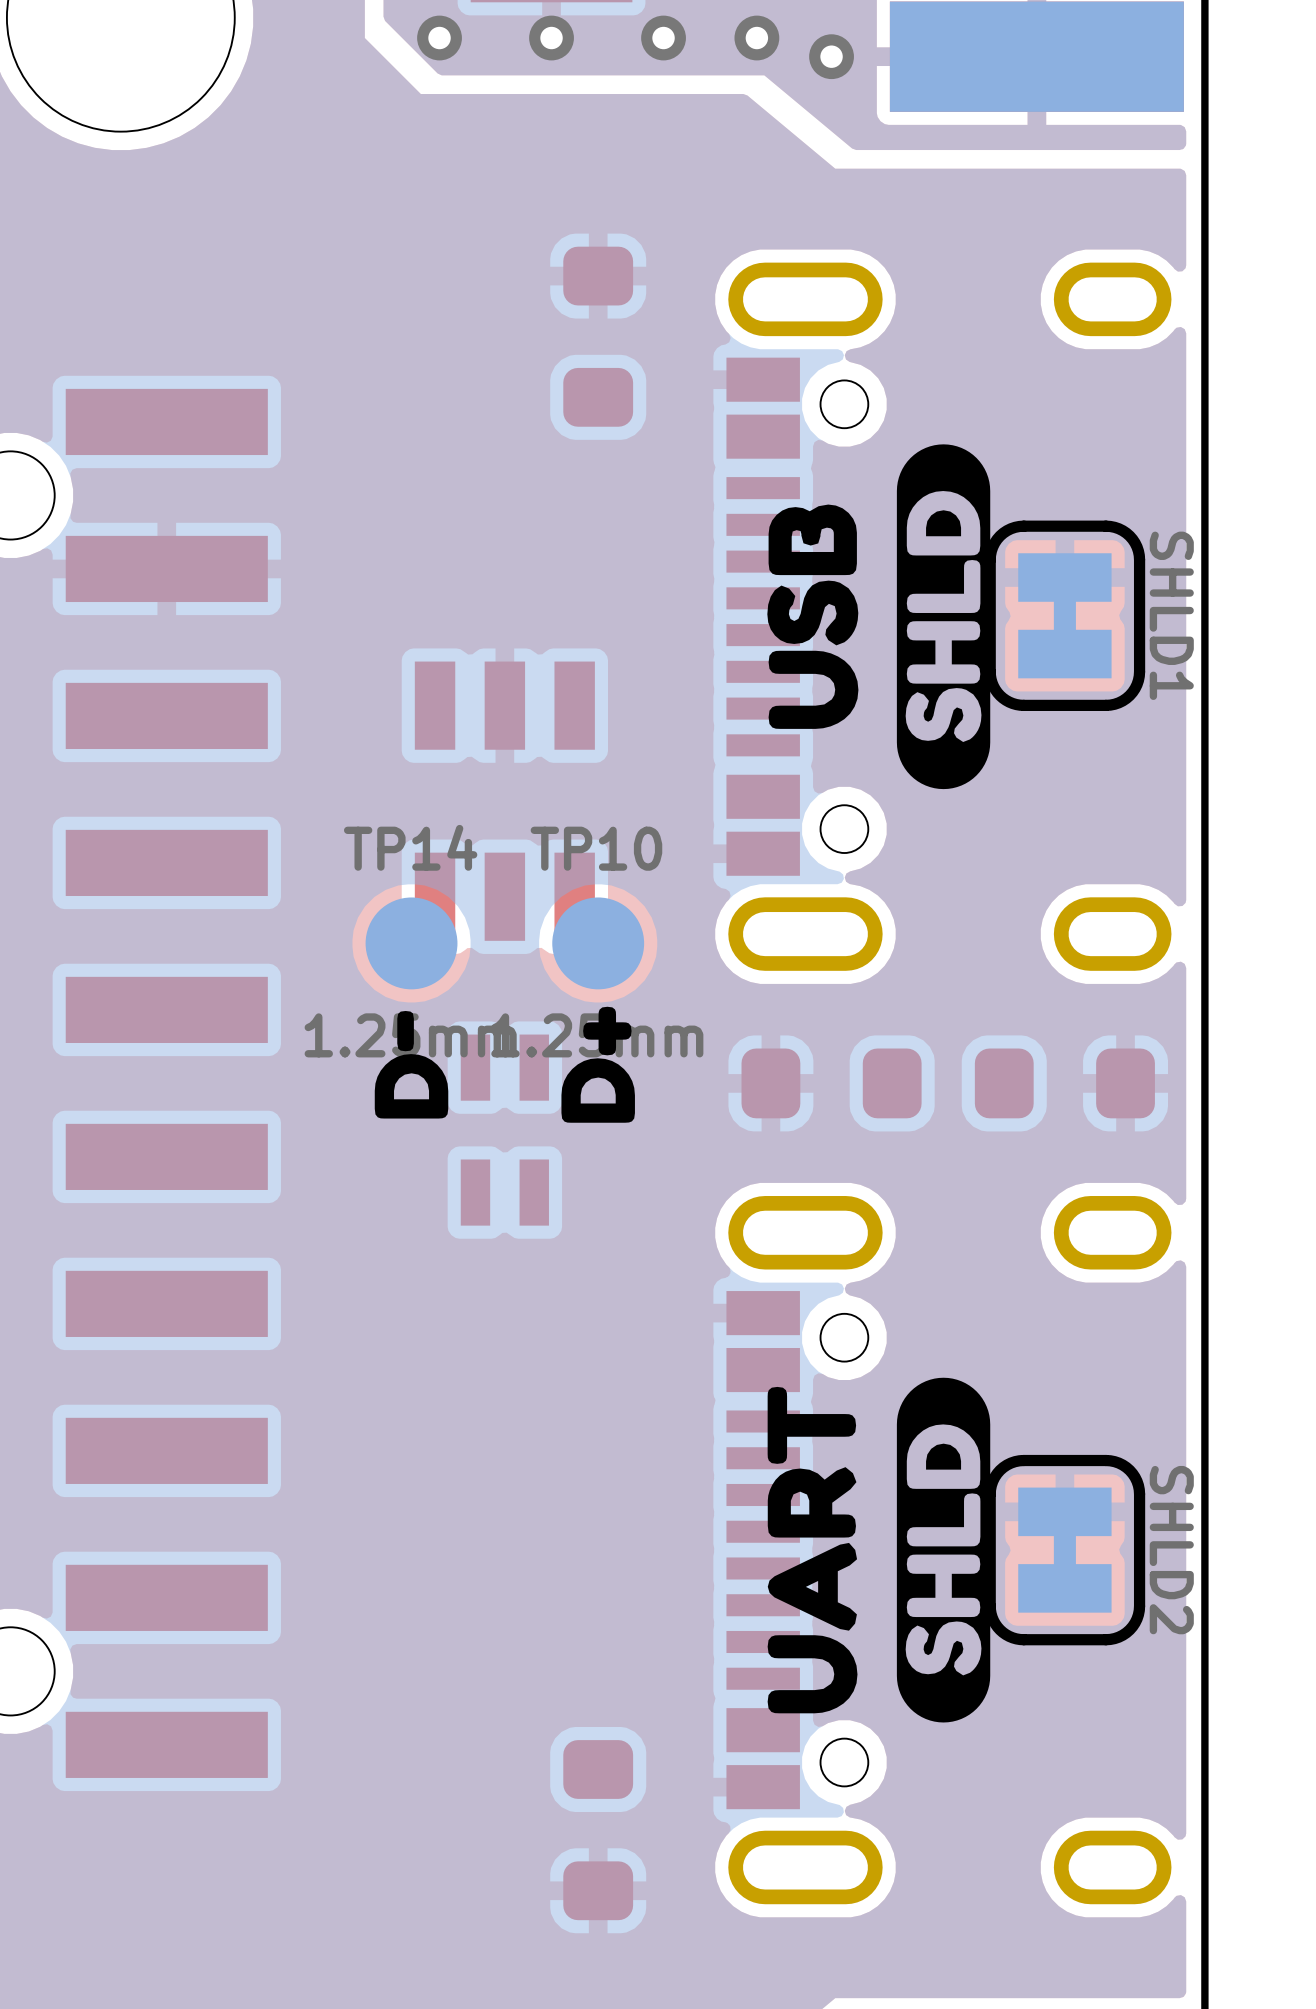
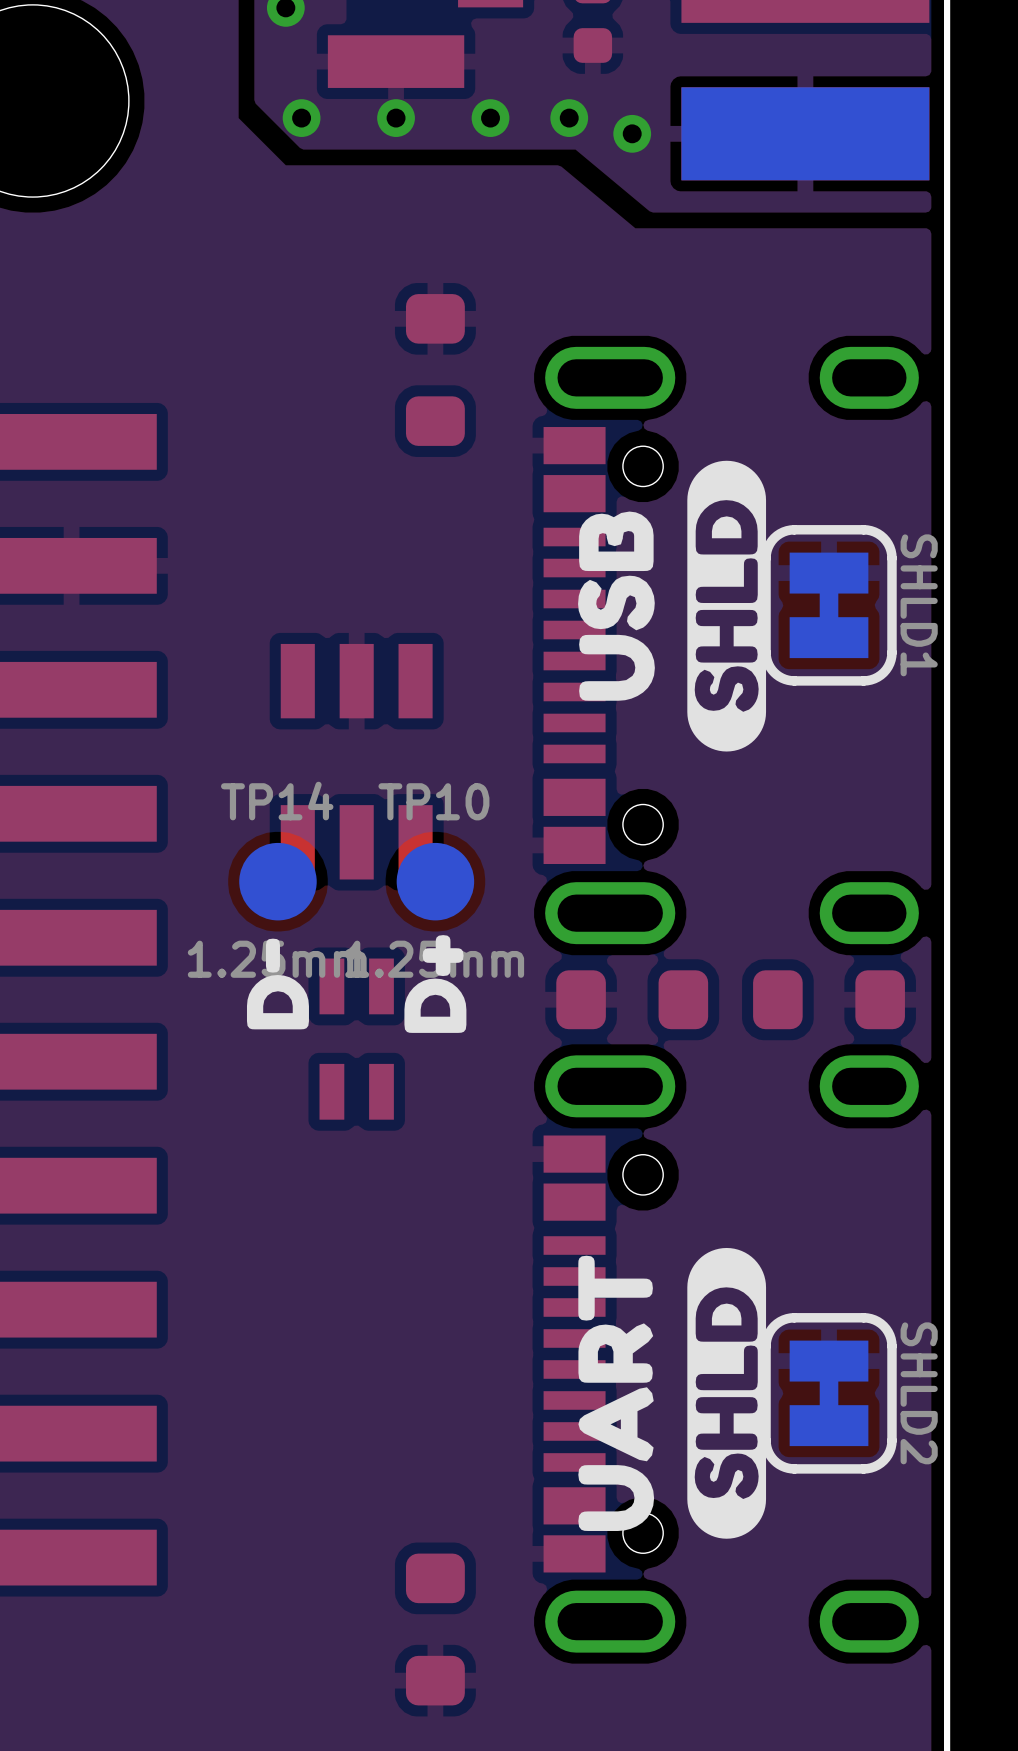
part position: (948, 616) -> (731, 645)
part position: (948, 1550) -> (731, 1353)

